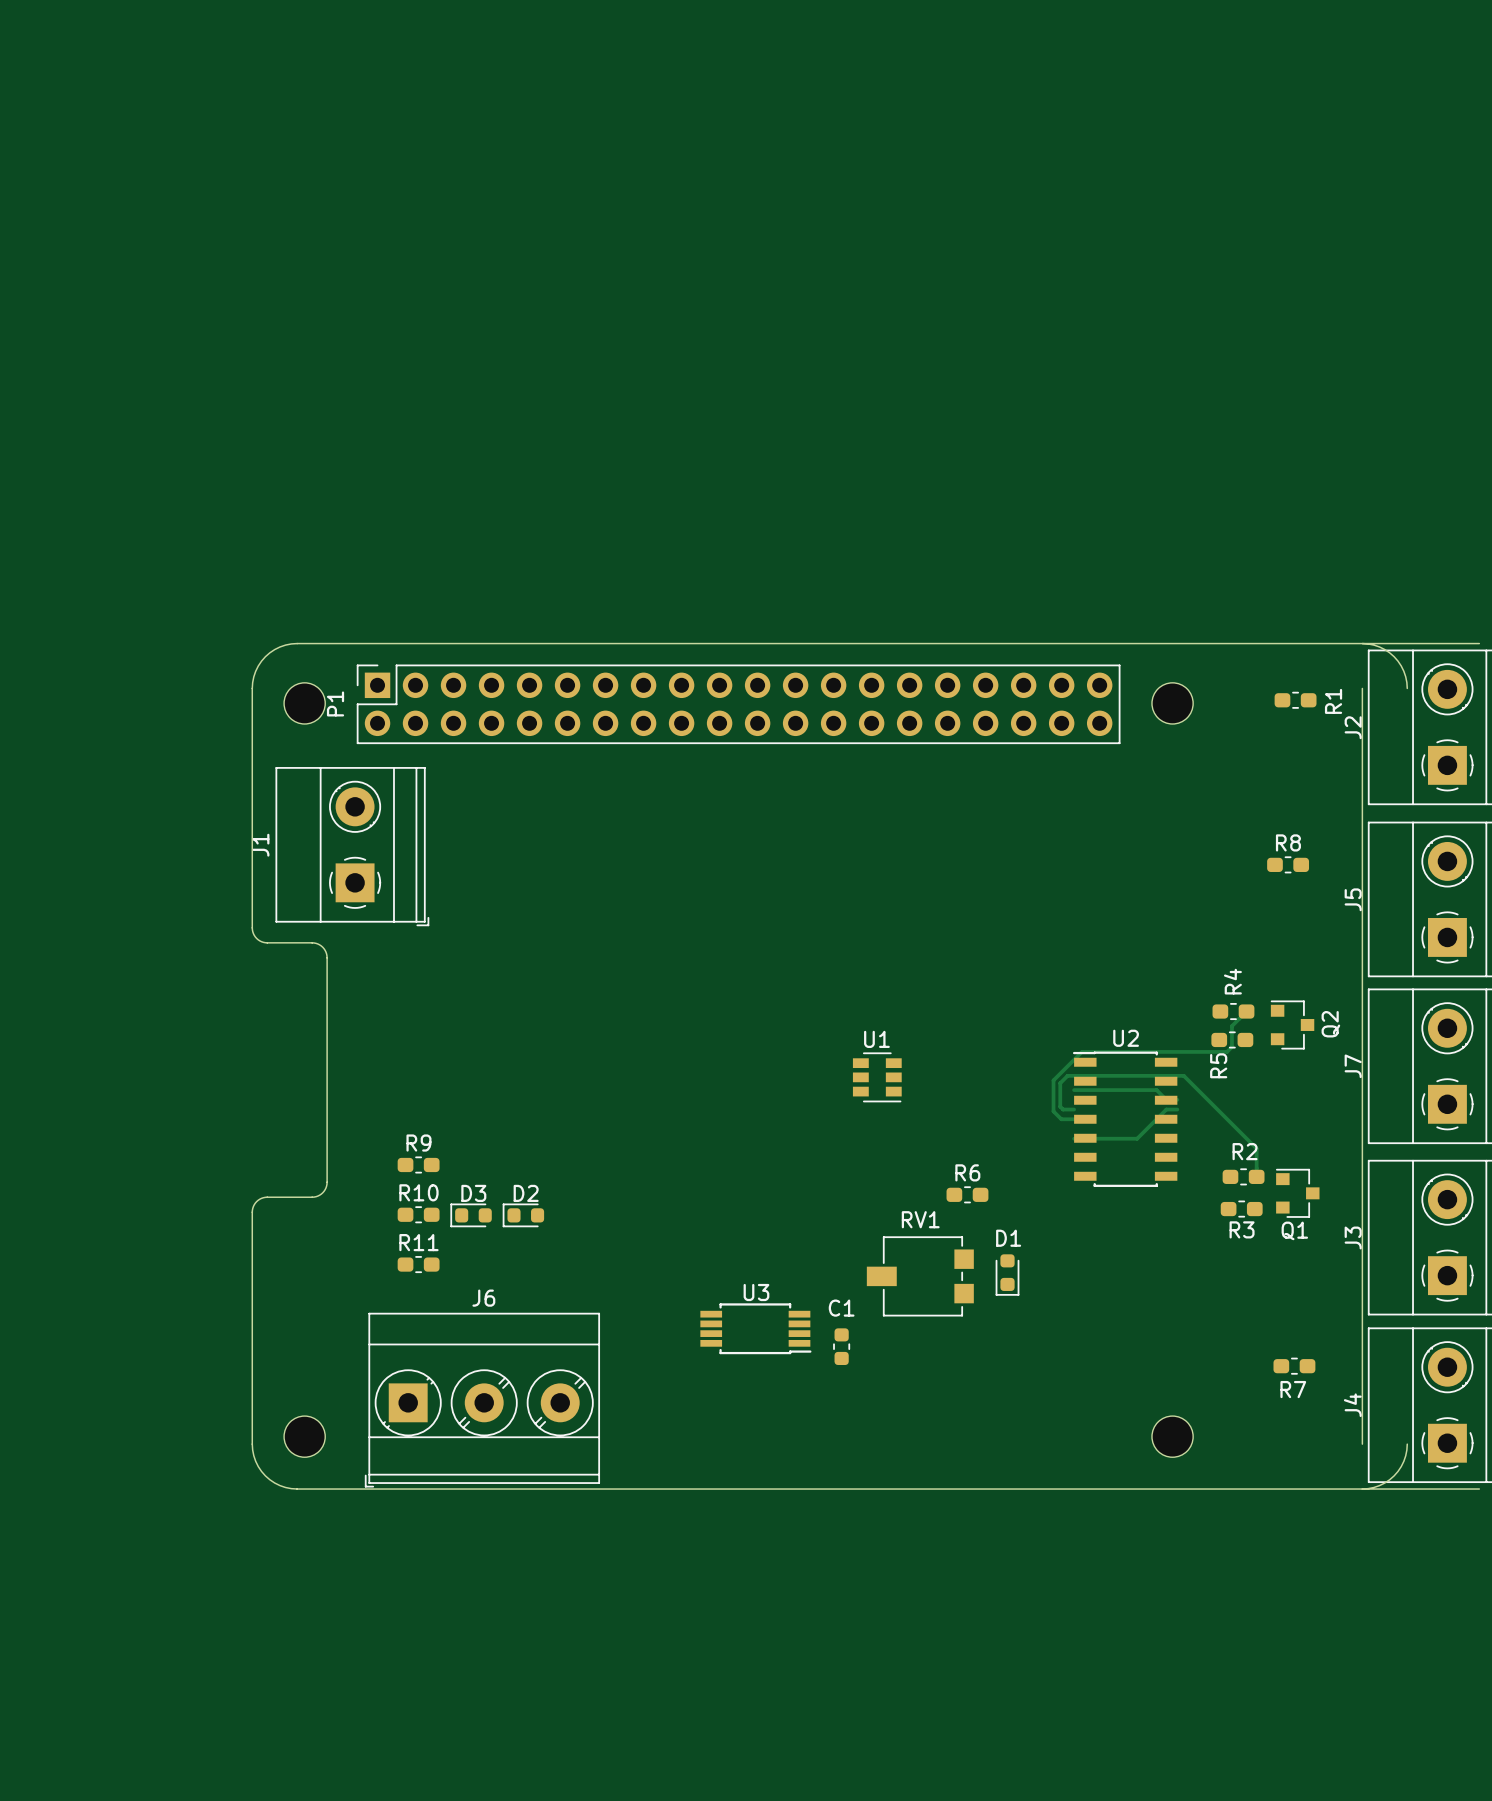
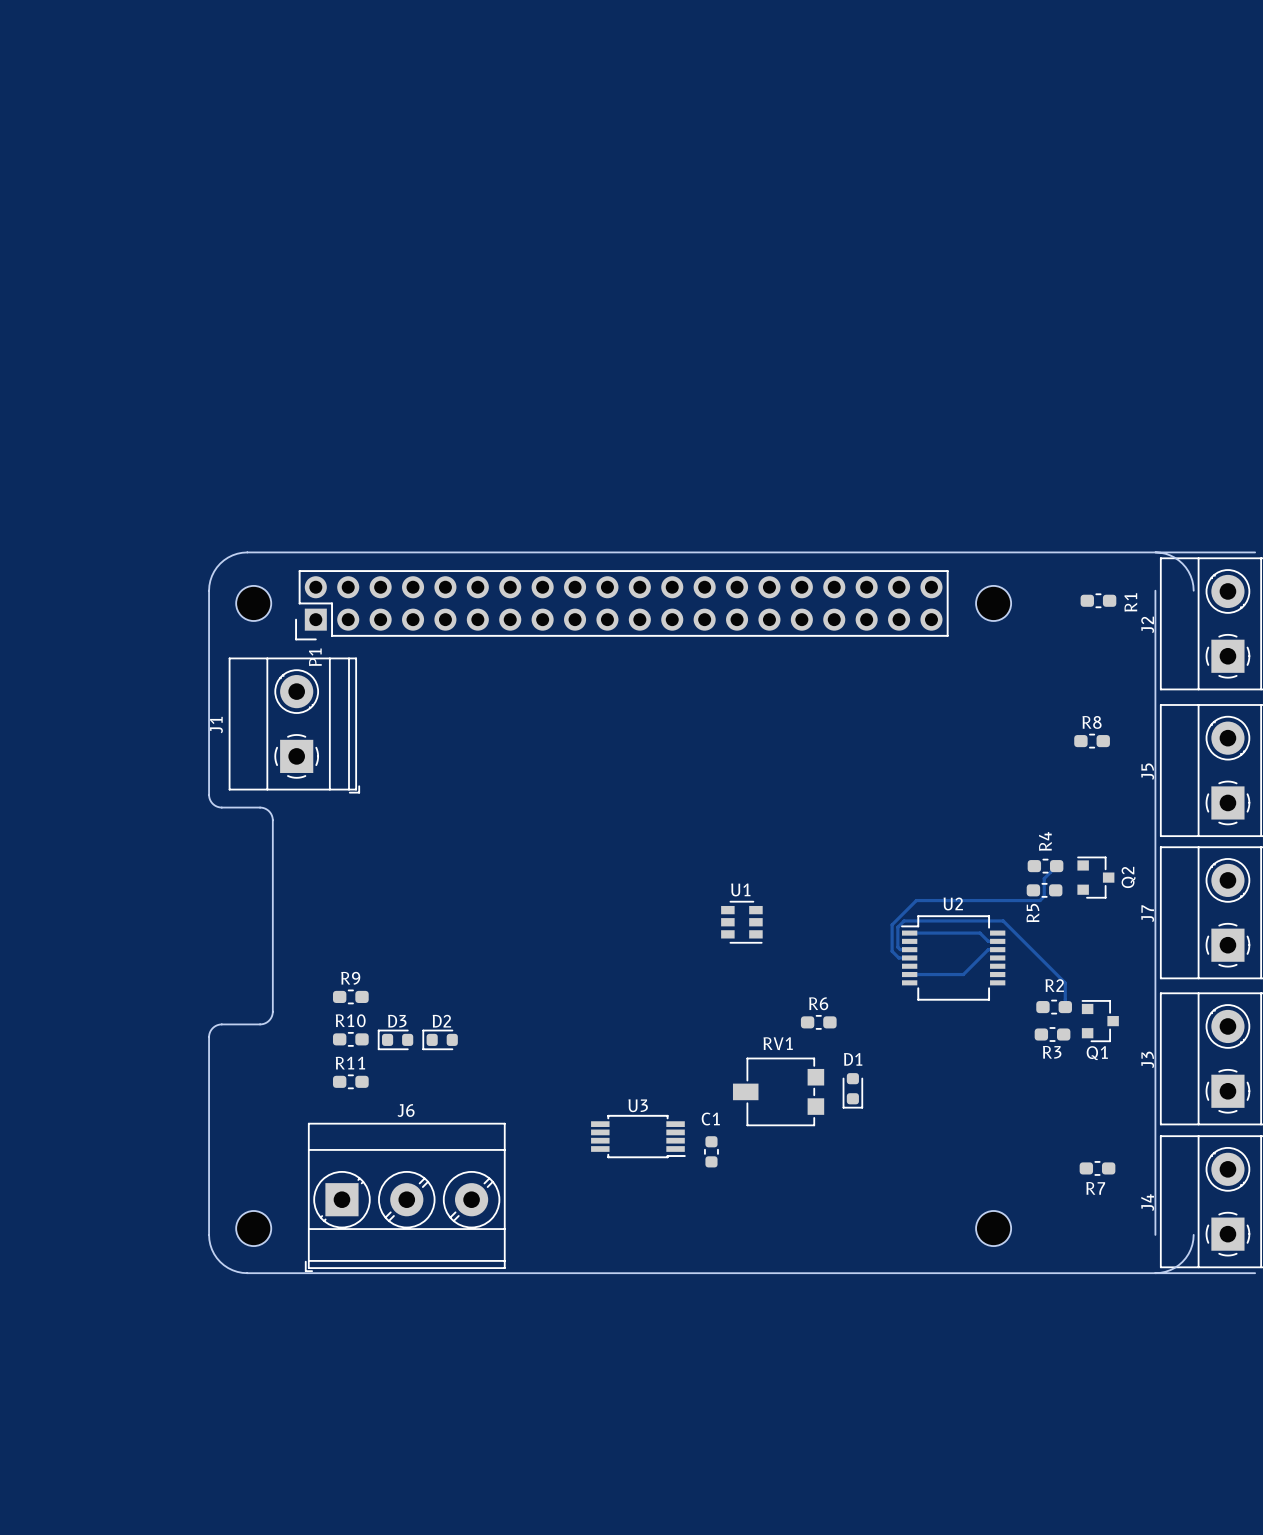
P1 footprint: [356, 664, 1121, 745] -> [295, 570, 949, 641]
P1 name position: P1 (335, 703) -> P1 (315, 657)
U2 footprint: [1072, 1051, 1178, 1187] -> [901, 915, 1006, 1001]

